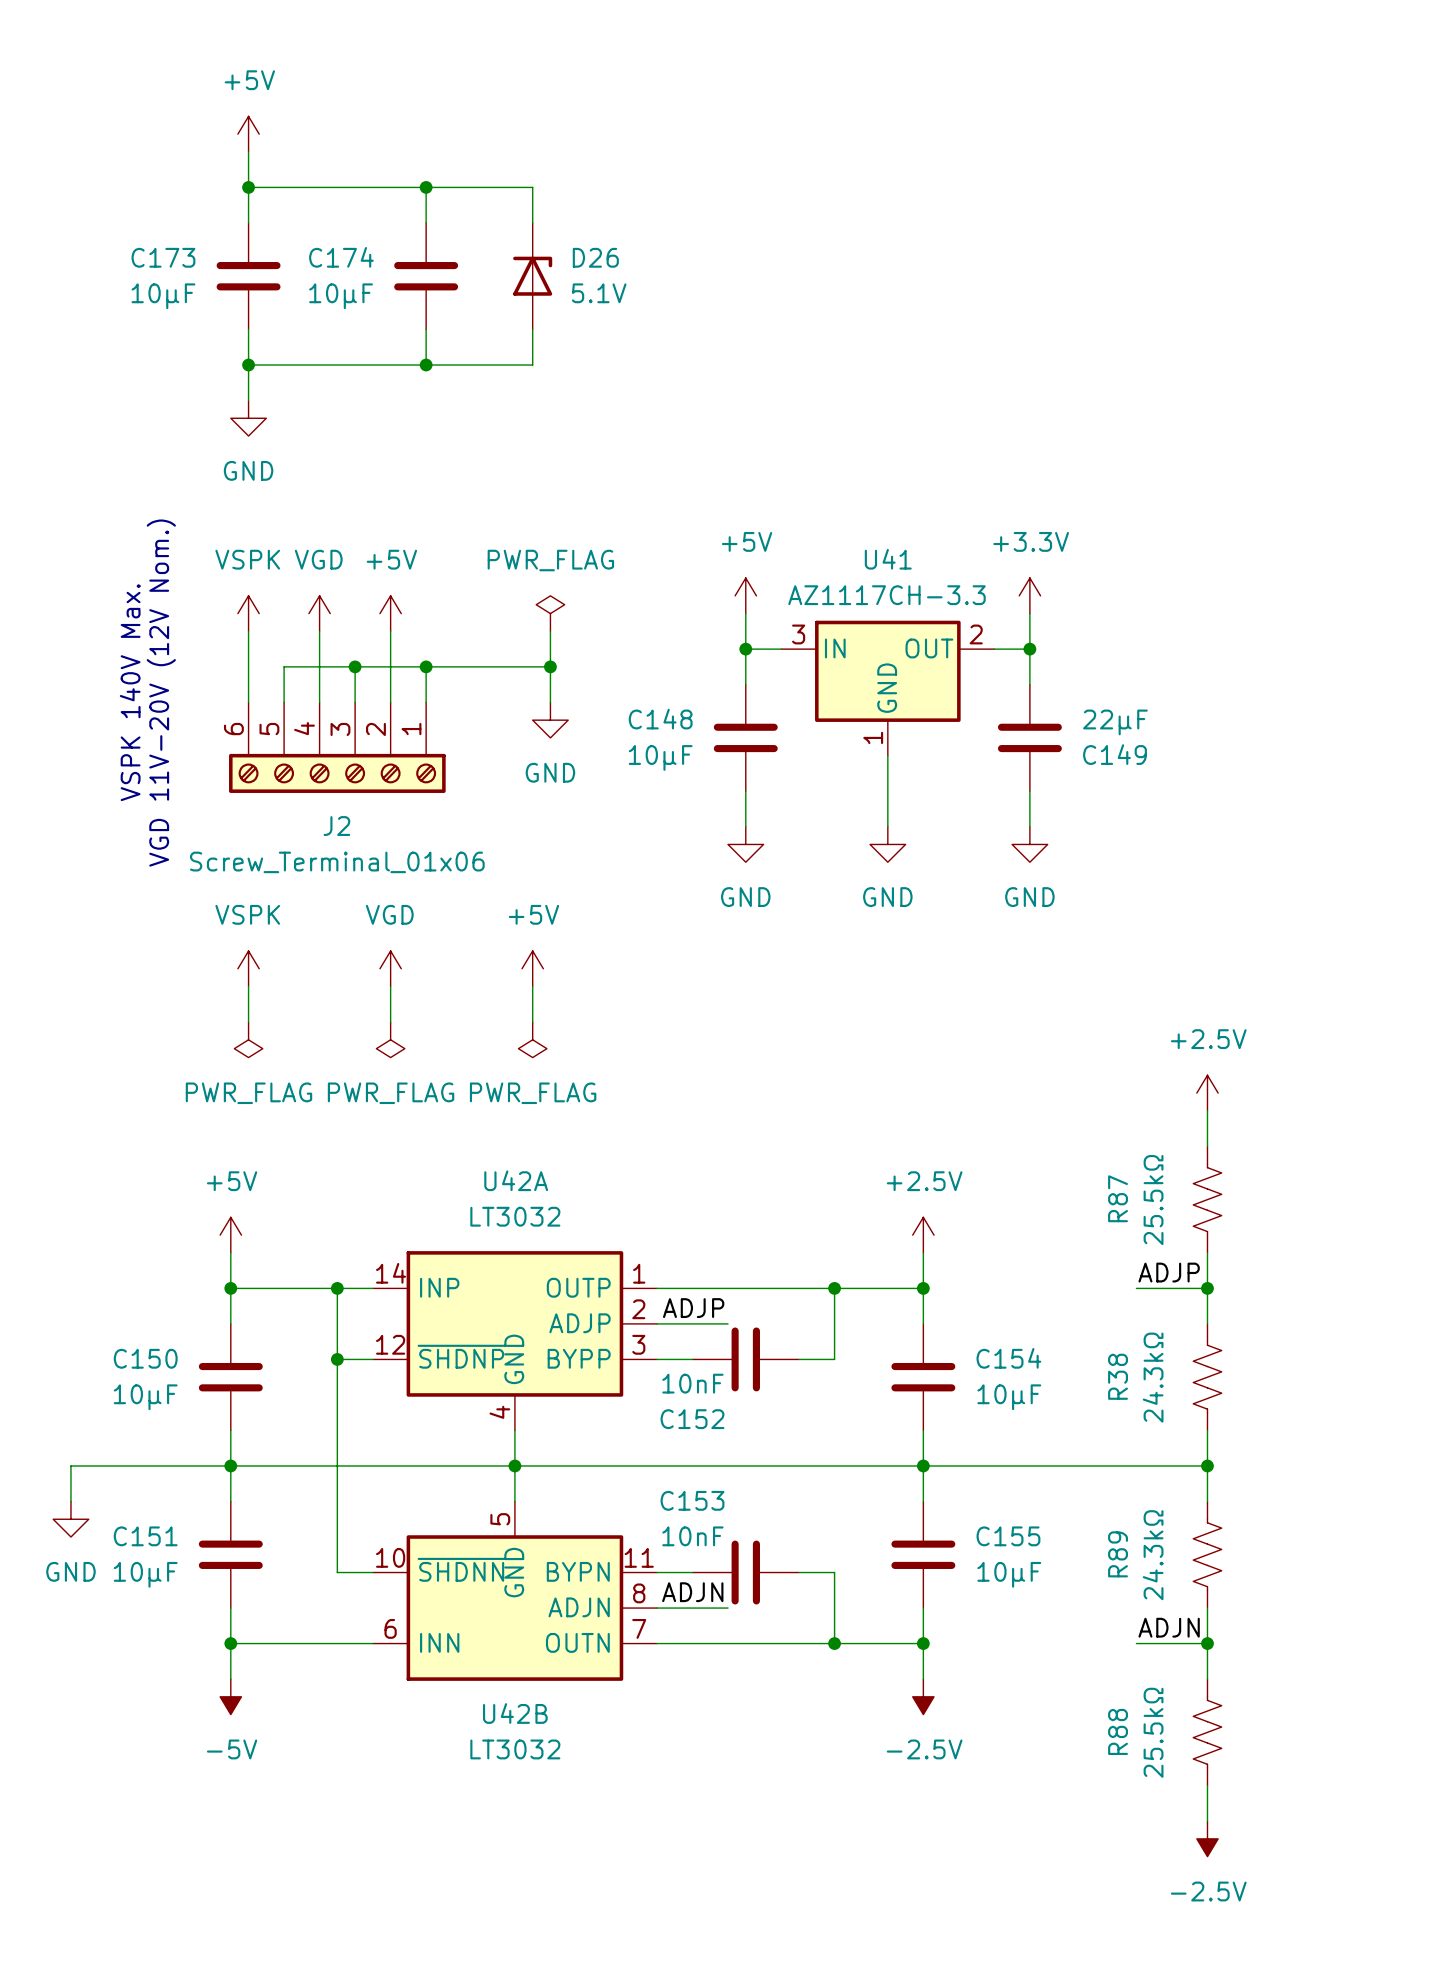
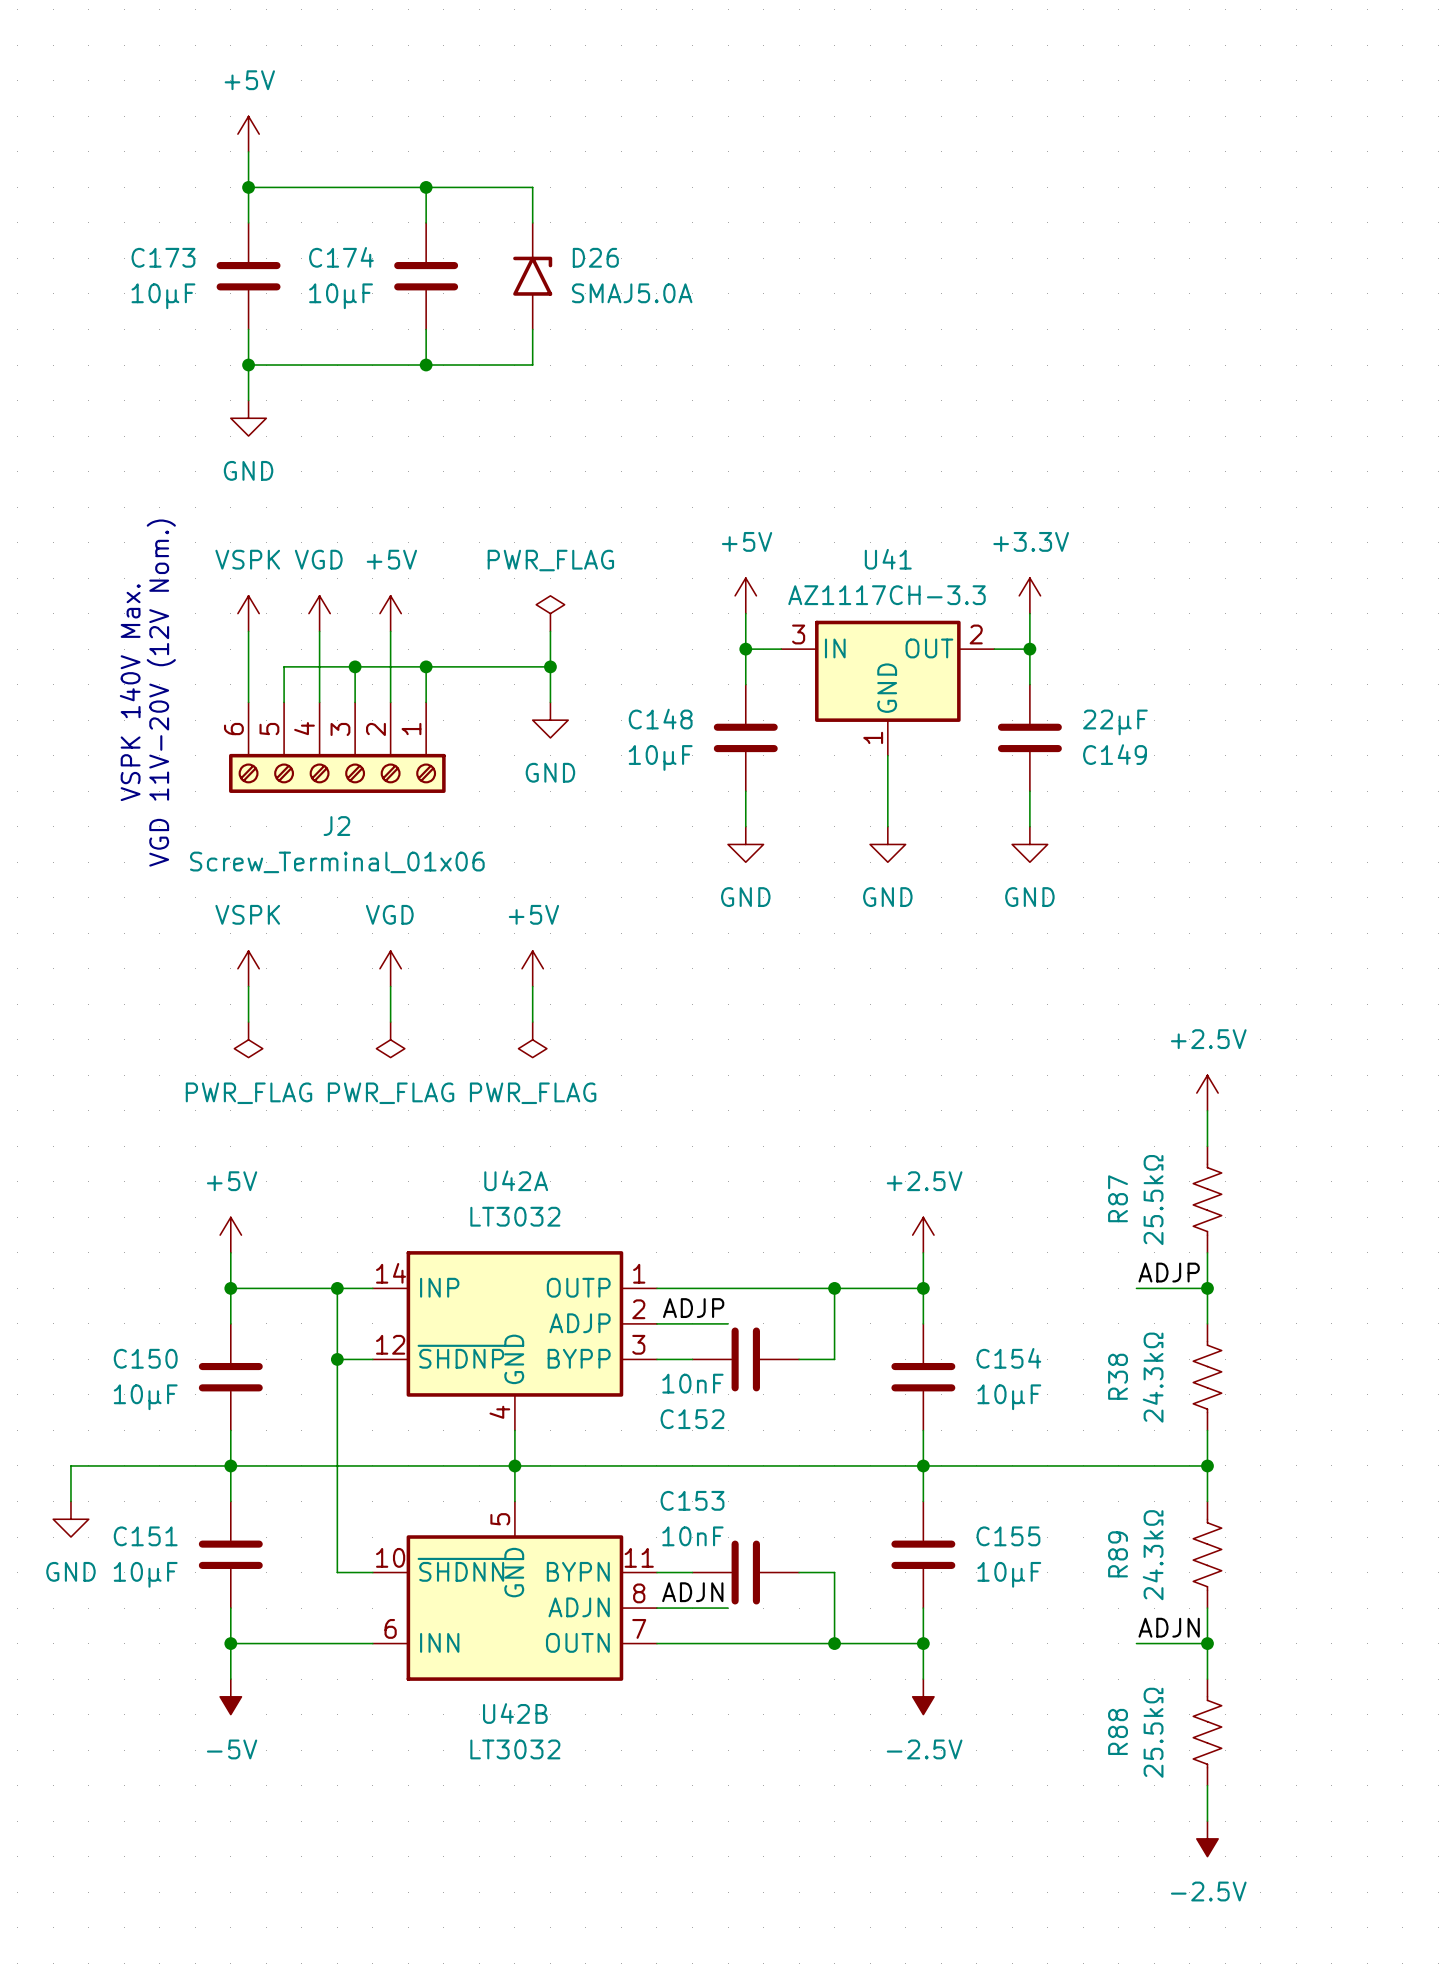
D26 symbol: [513, 222, 553, 330] -> [513, 222, 553, 330]
D26 value: 5.1V (599, 293) -> SMAJ5.0A (632, 293)

